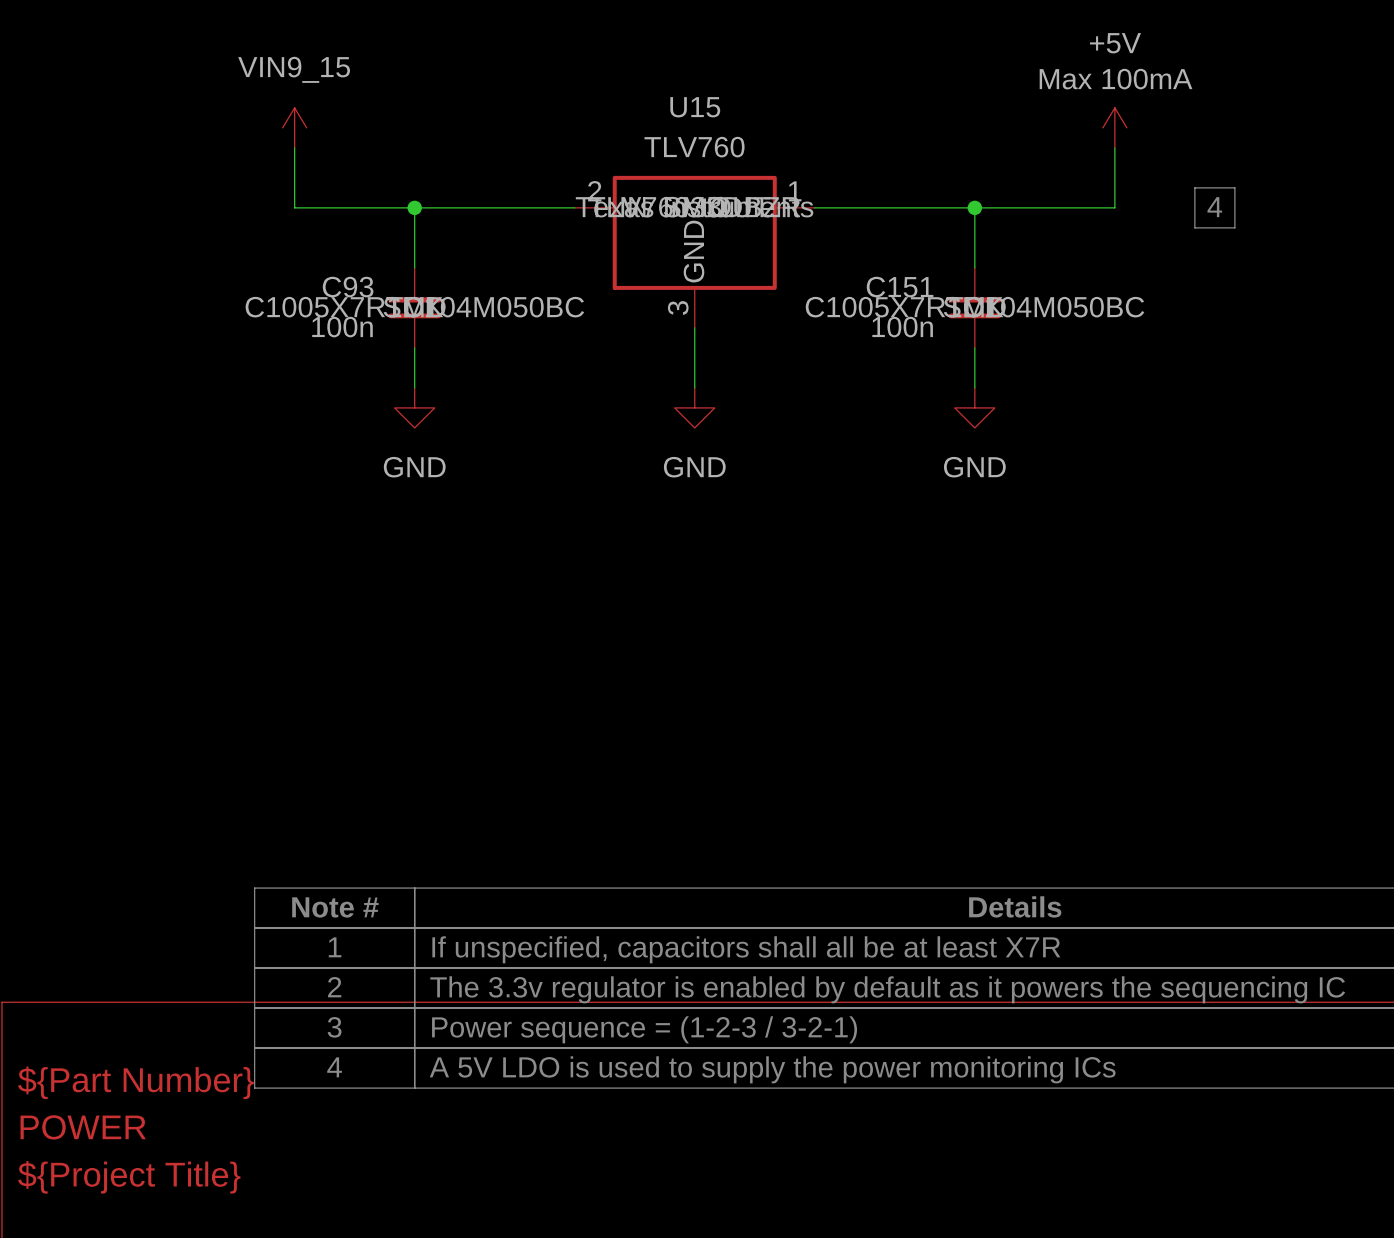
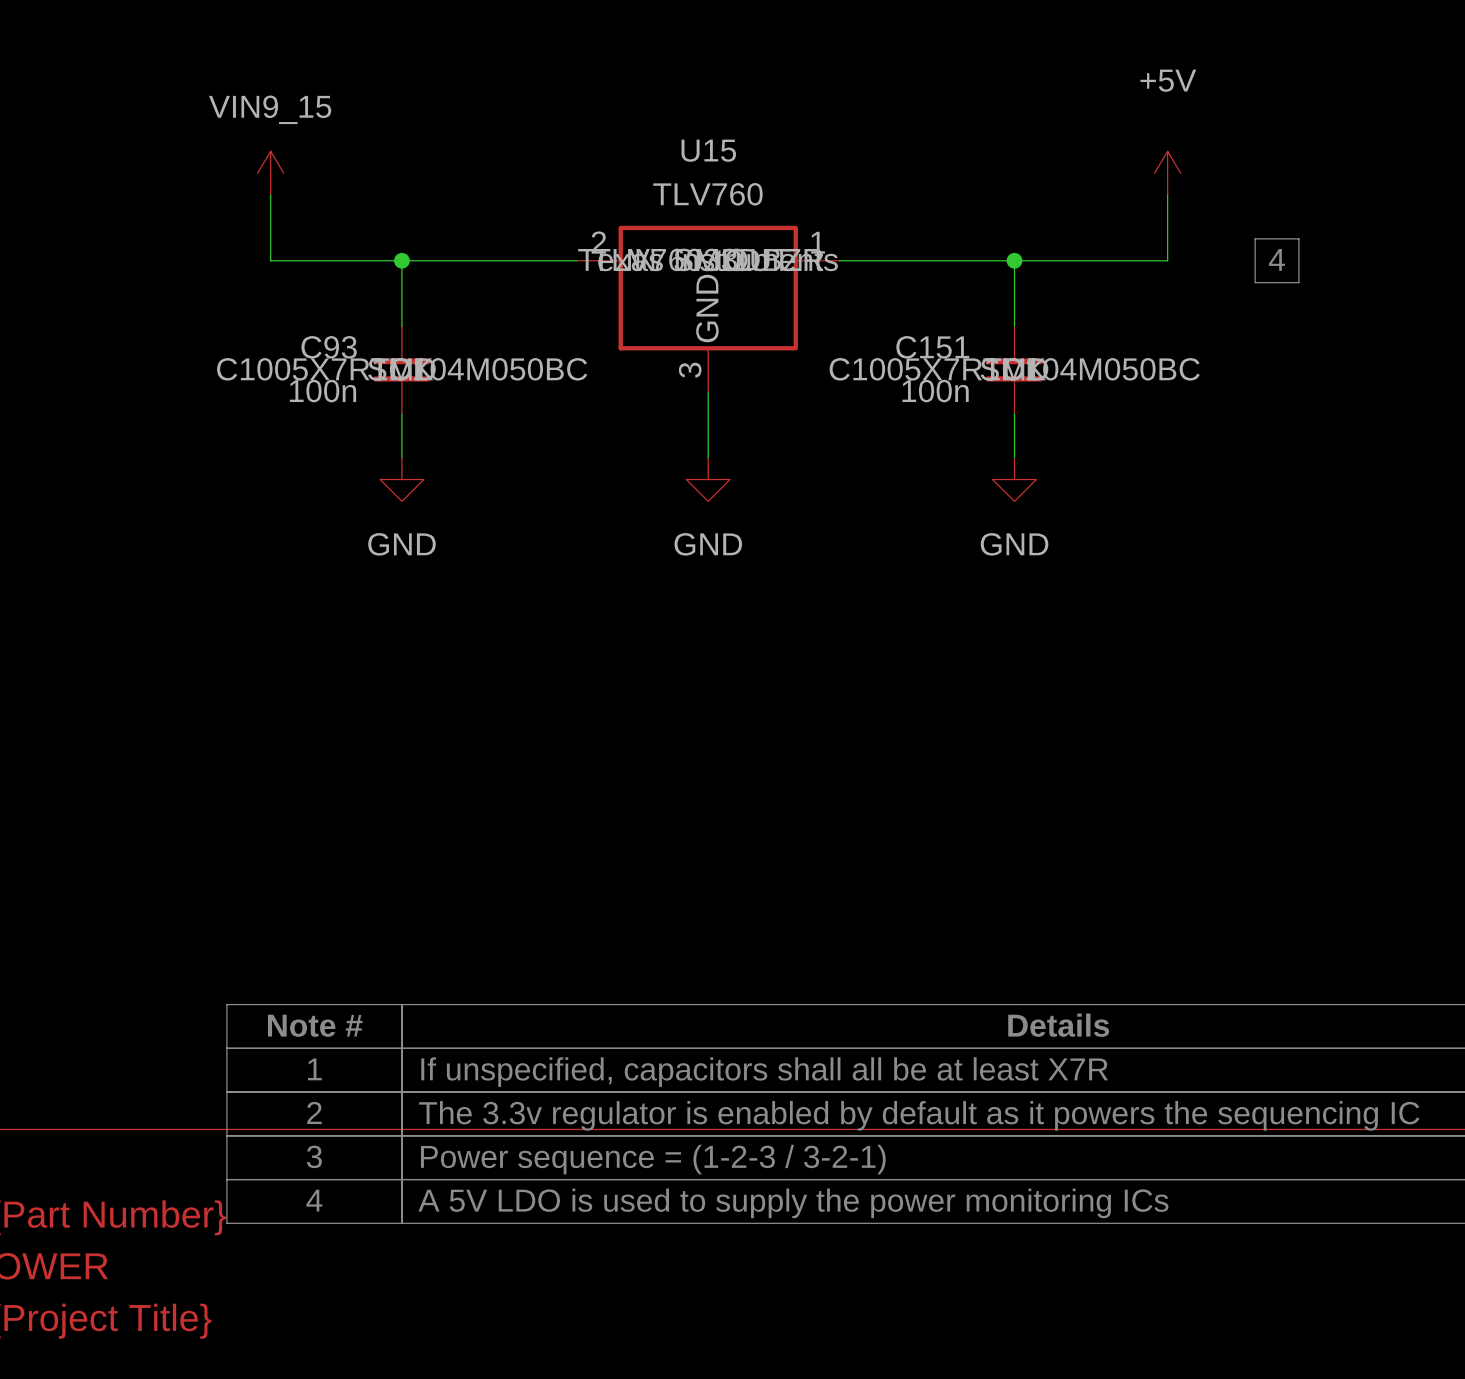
power symbol text: Max 100mA (1116, 79) -> none

